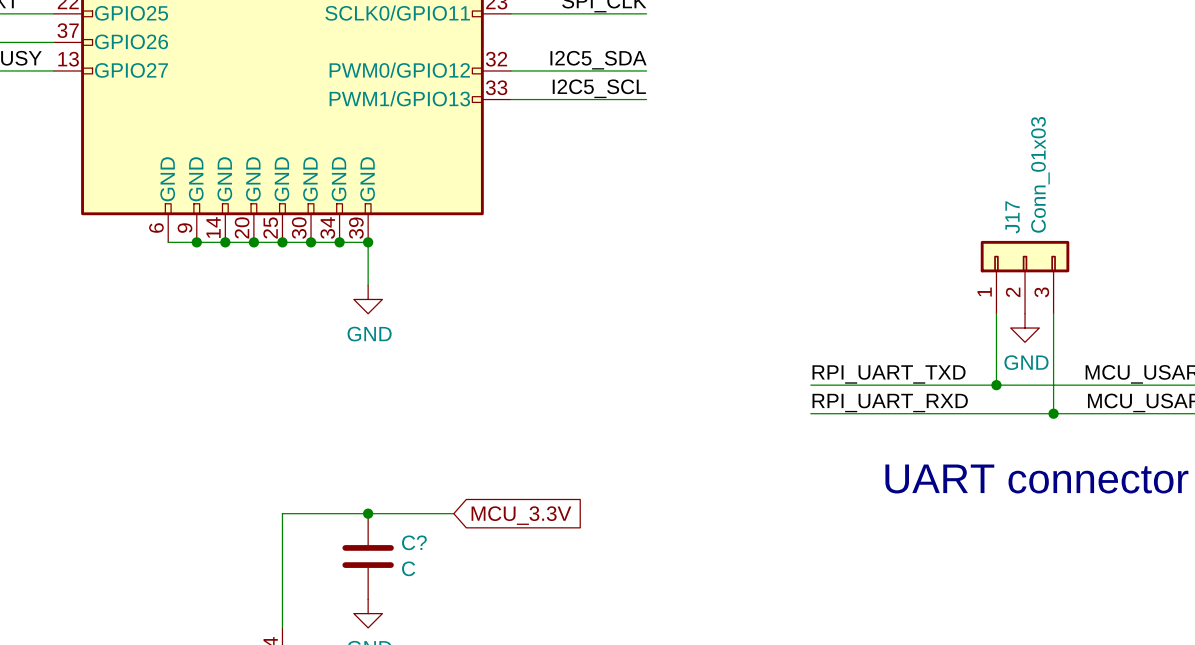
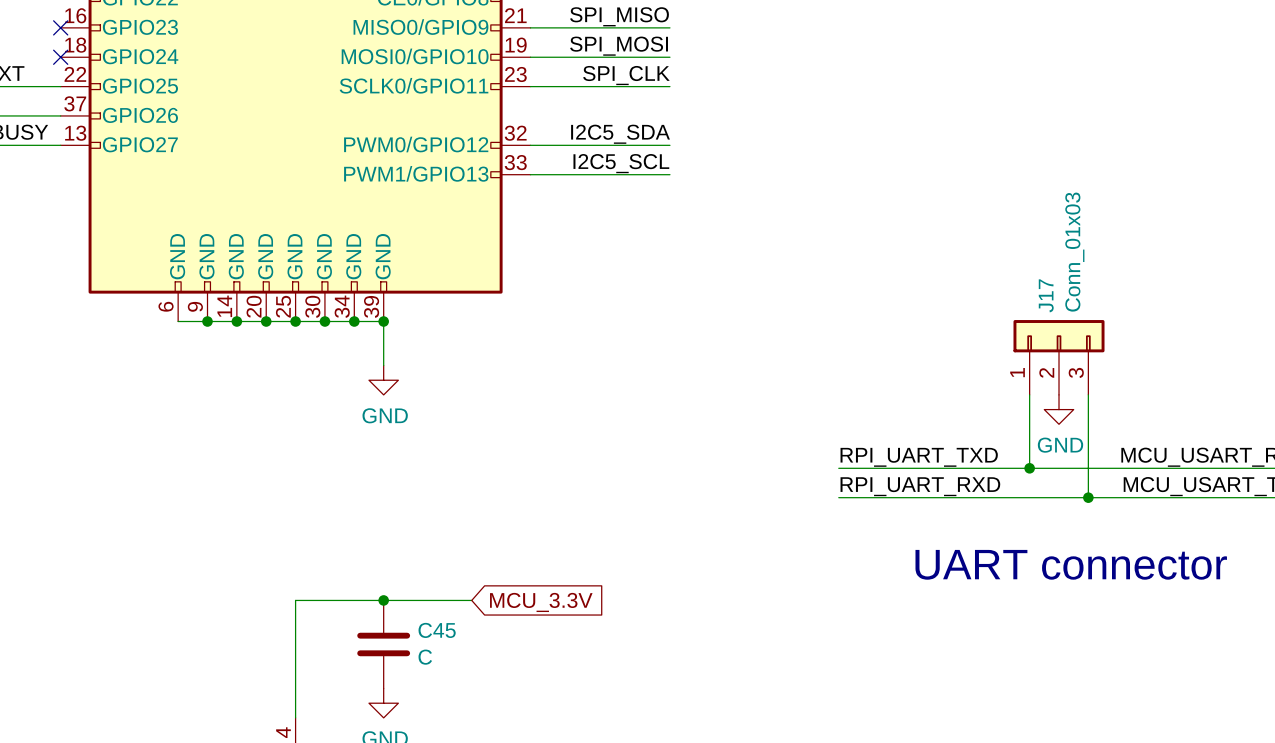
C? name: C? (414, 542) -> C45 (437, 630)

